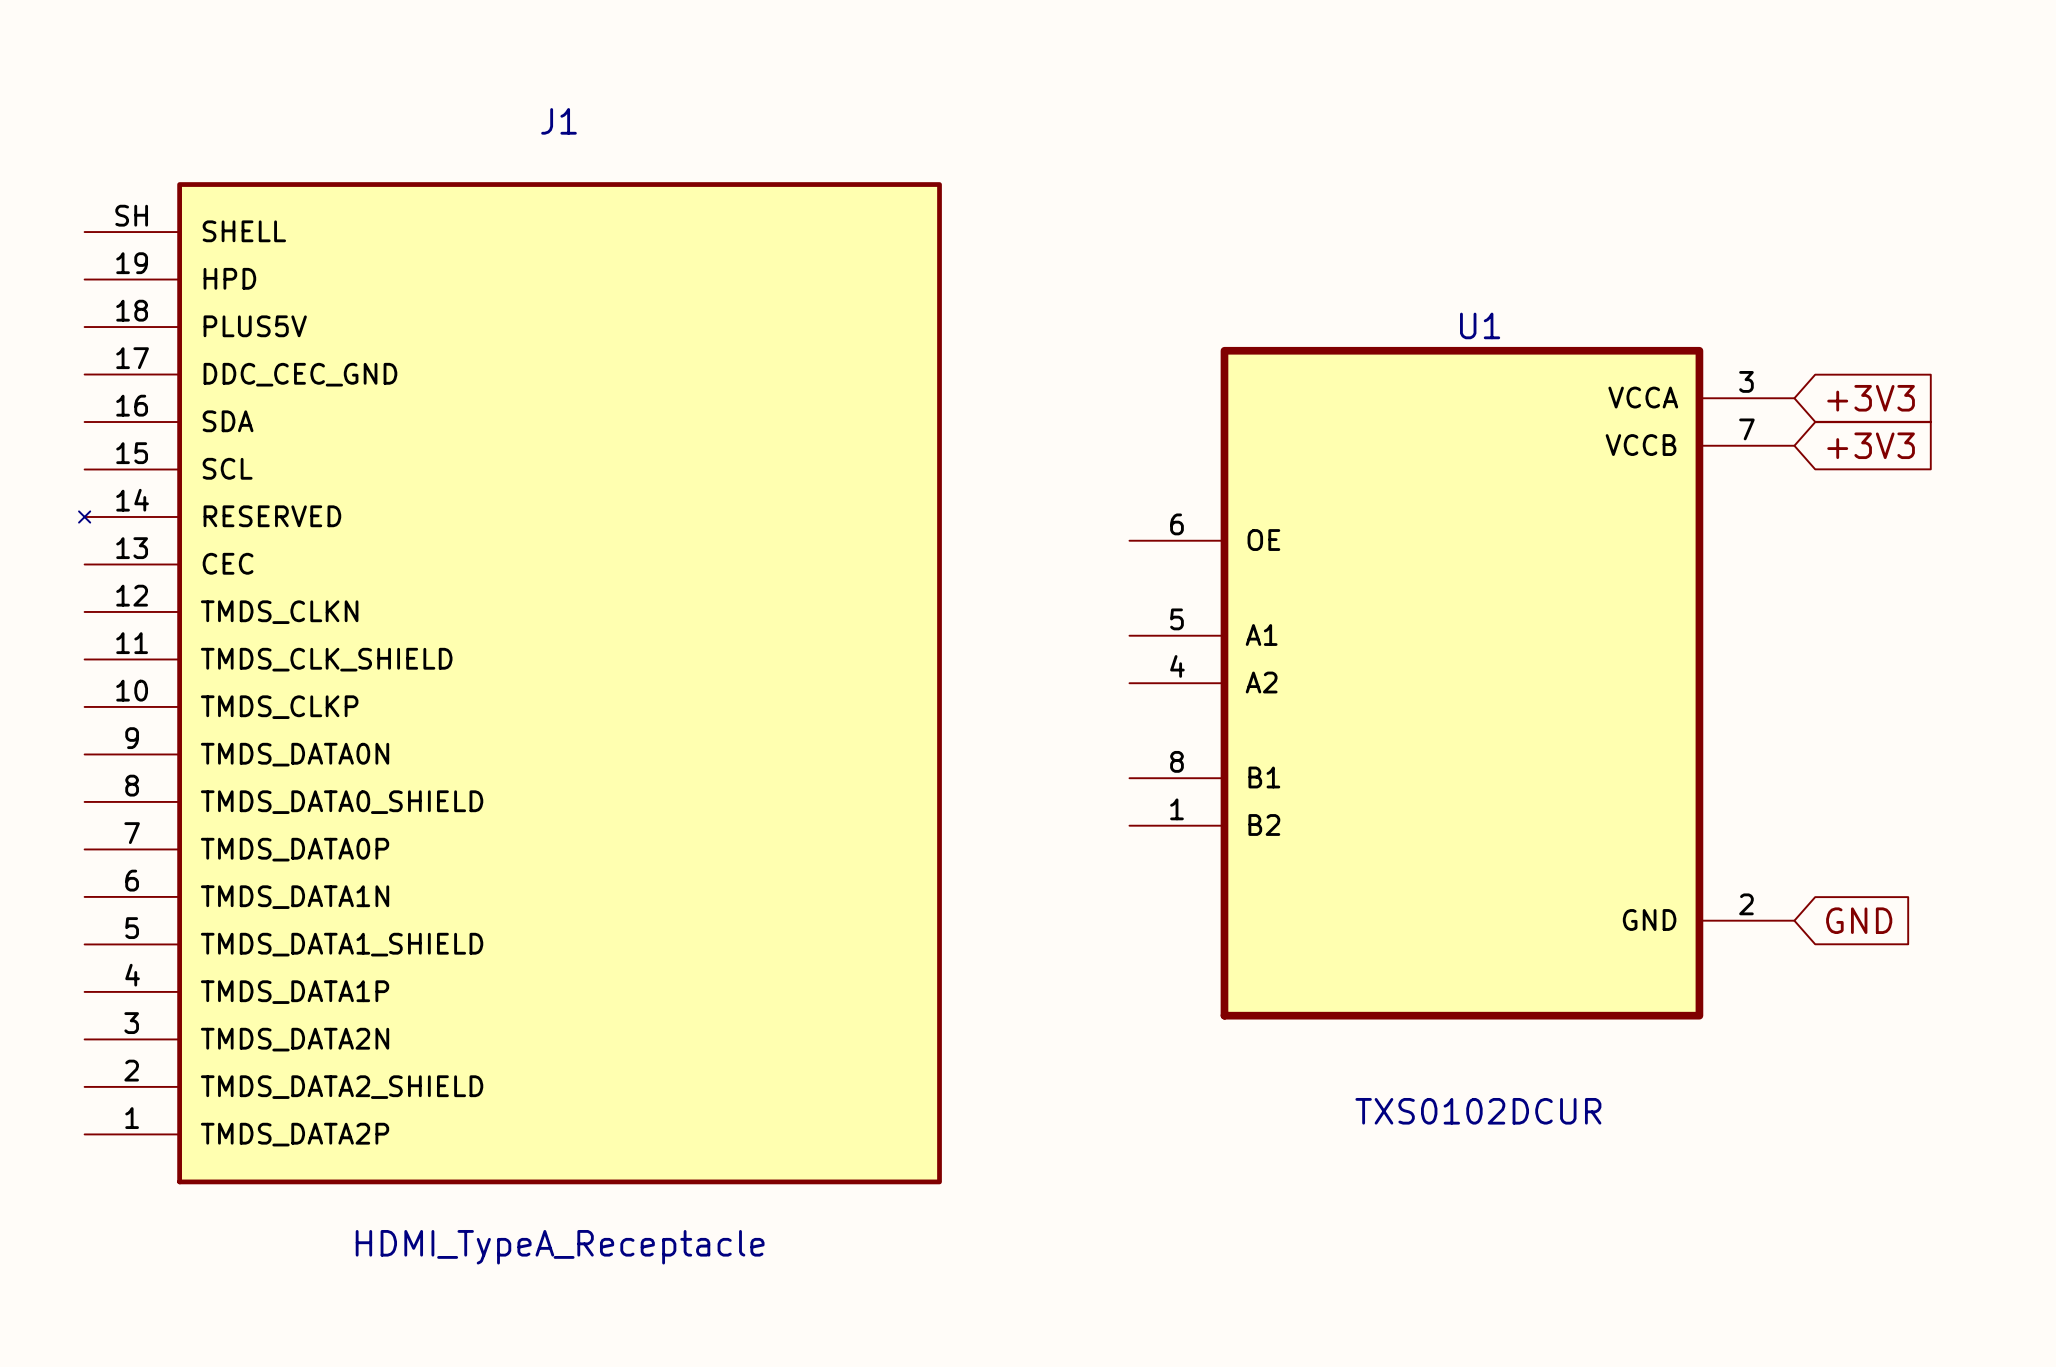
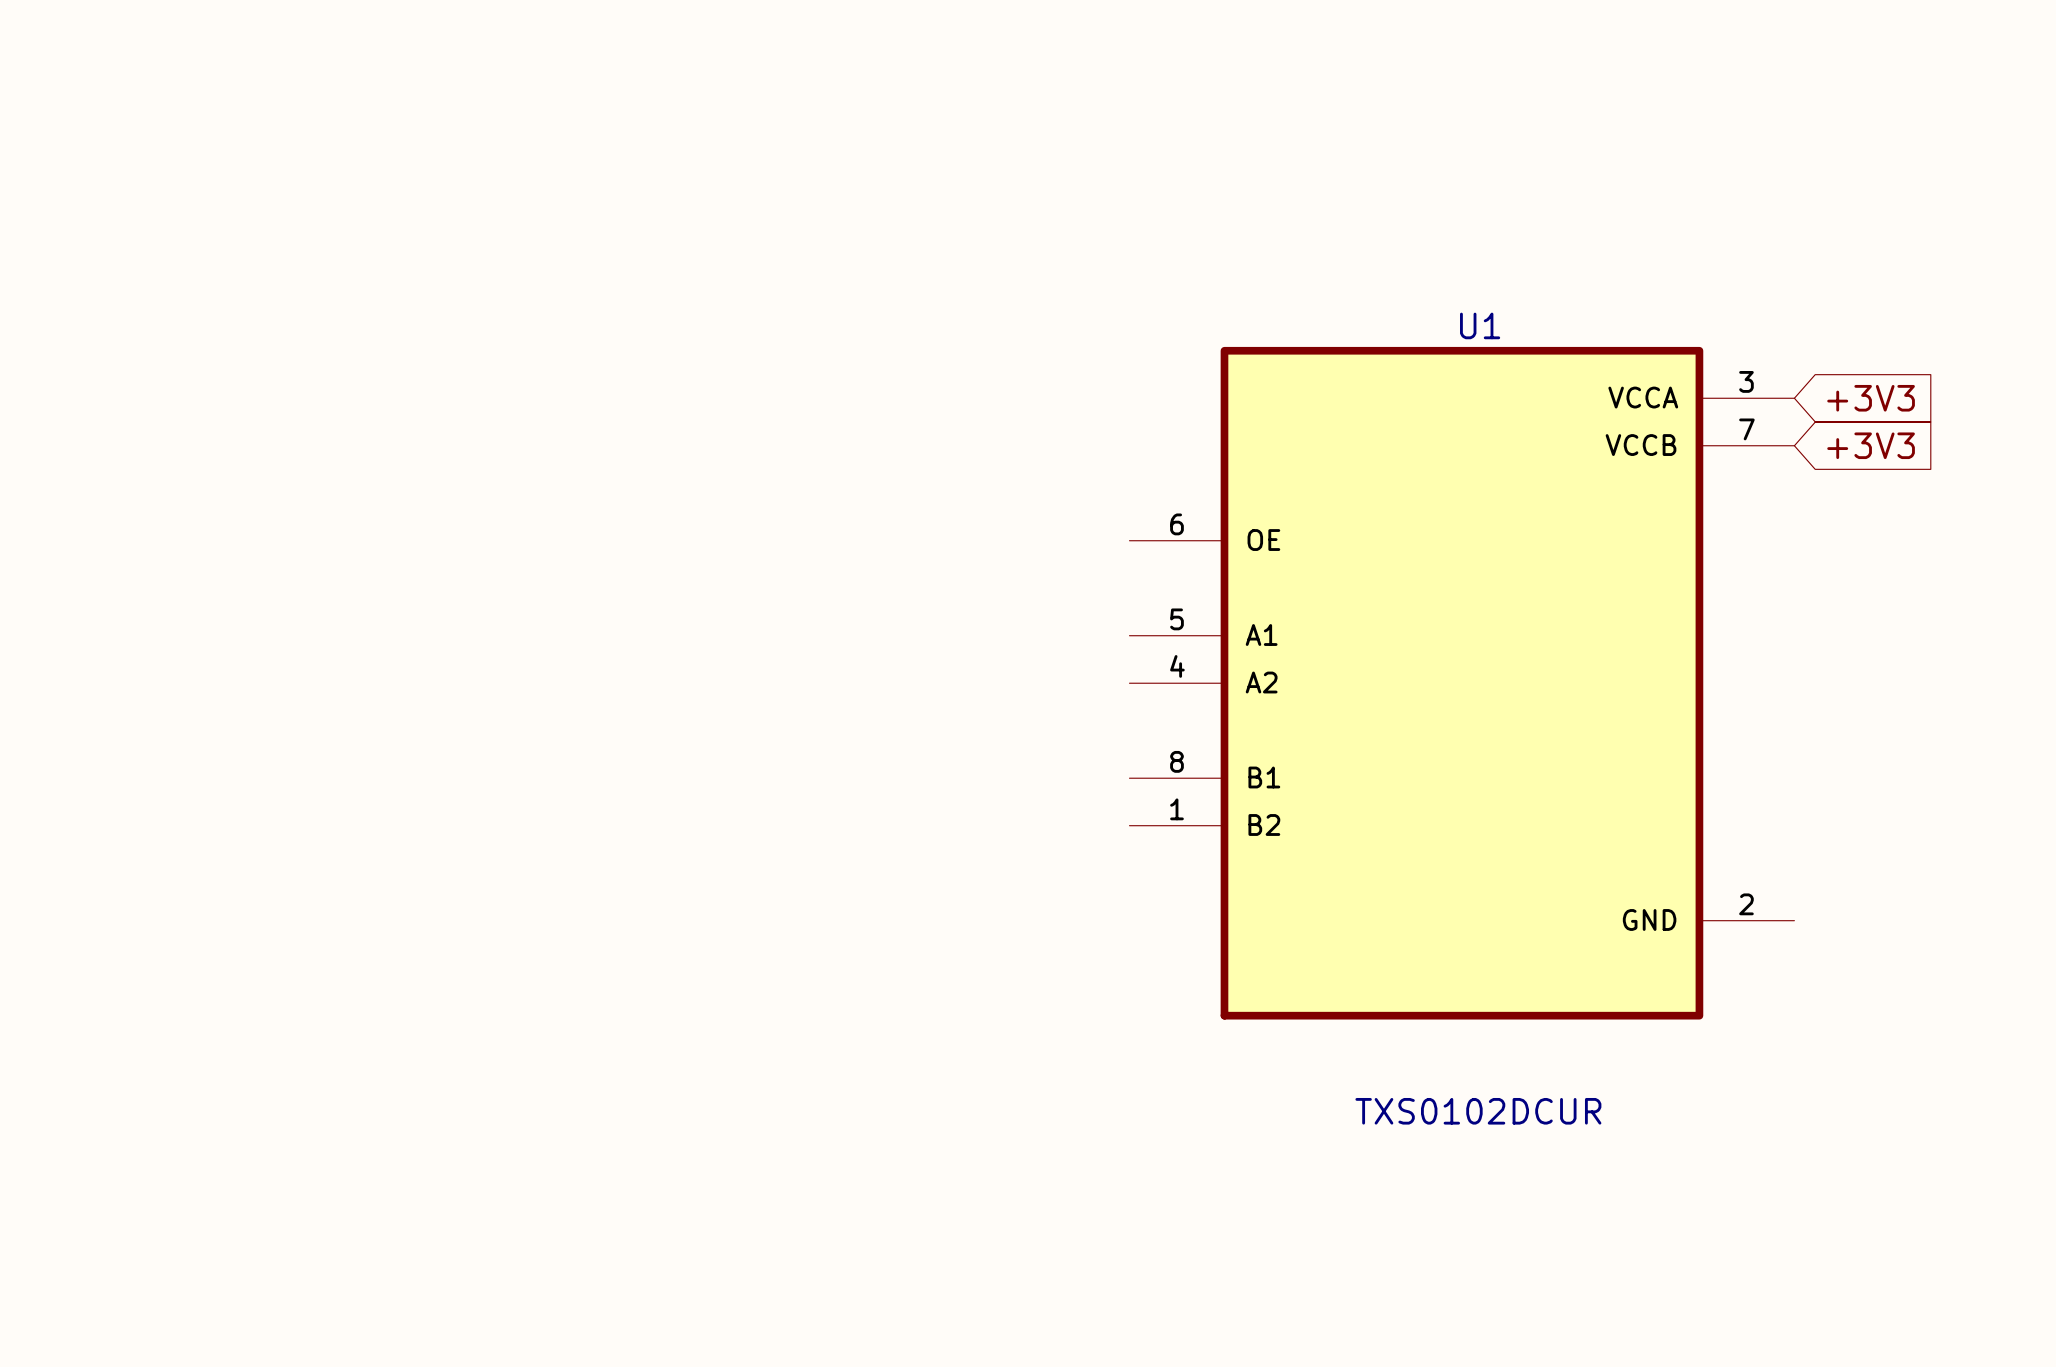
J1: HDMI_TypeA_Receptacle (510, 683) -> none
global label: GND (1859, 920) -> none

